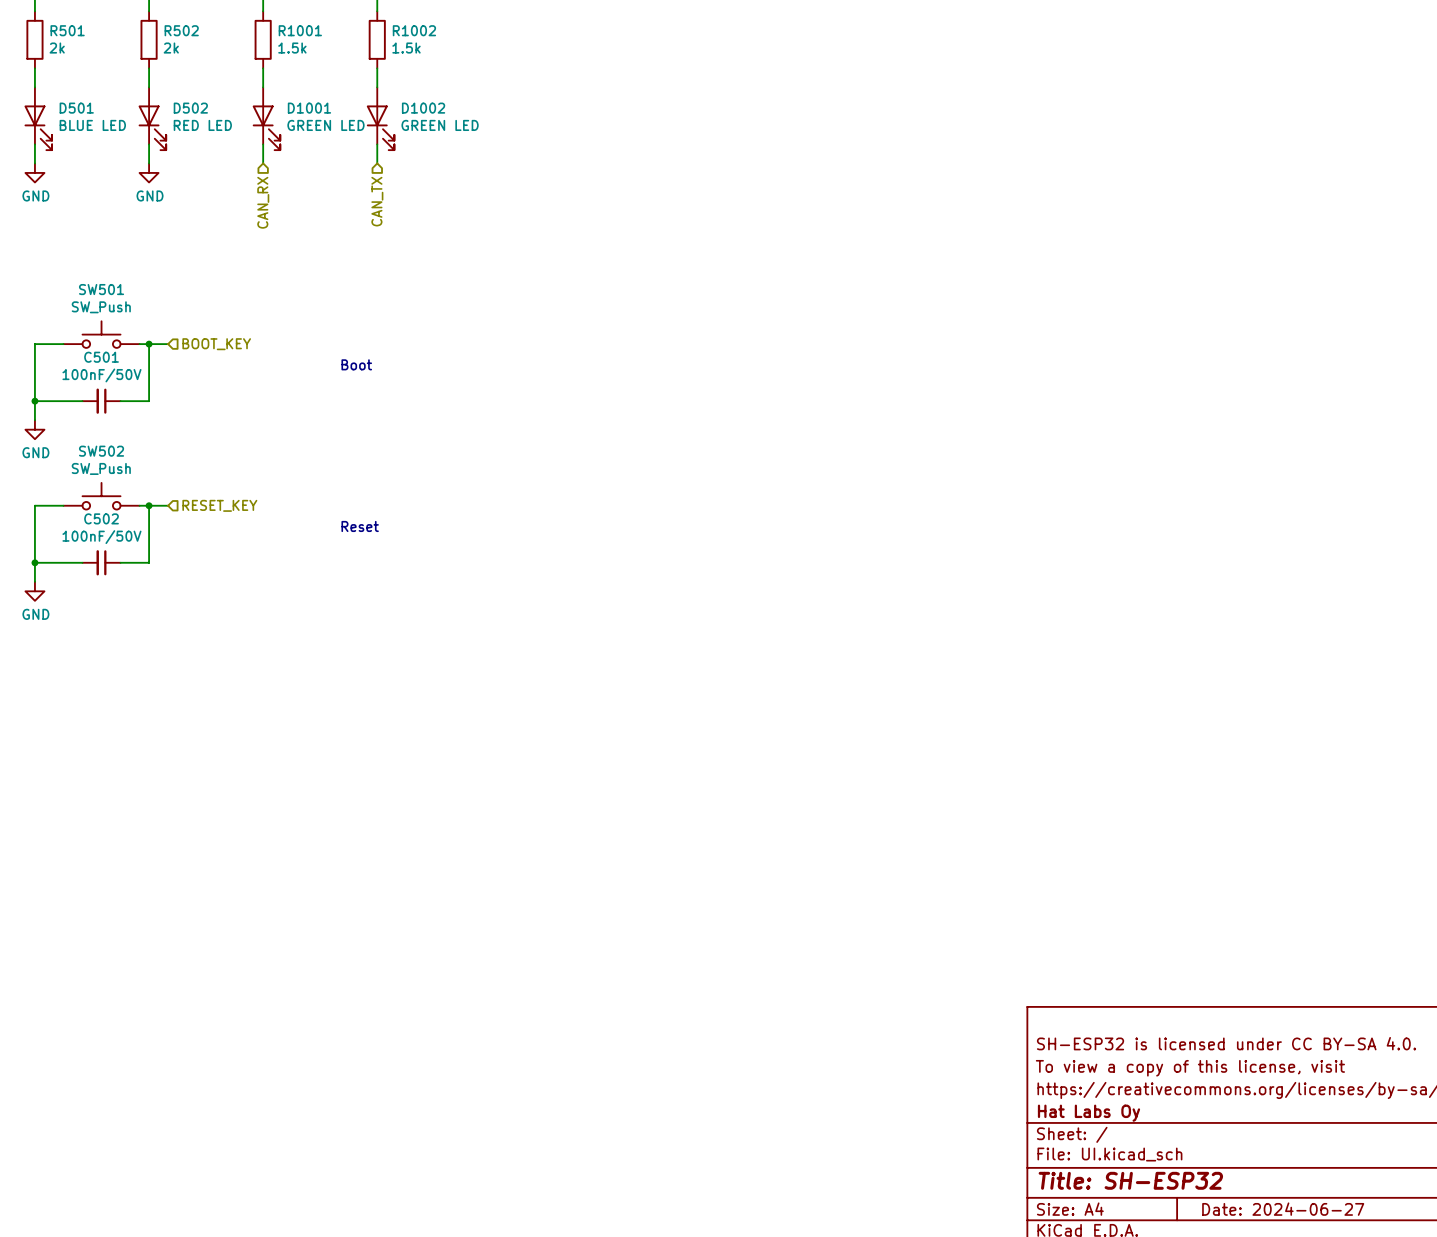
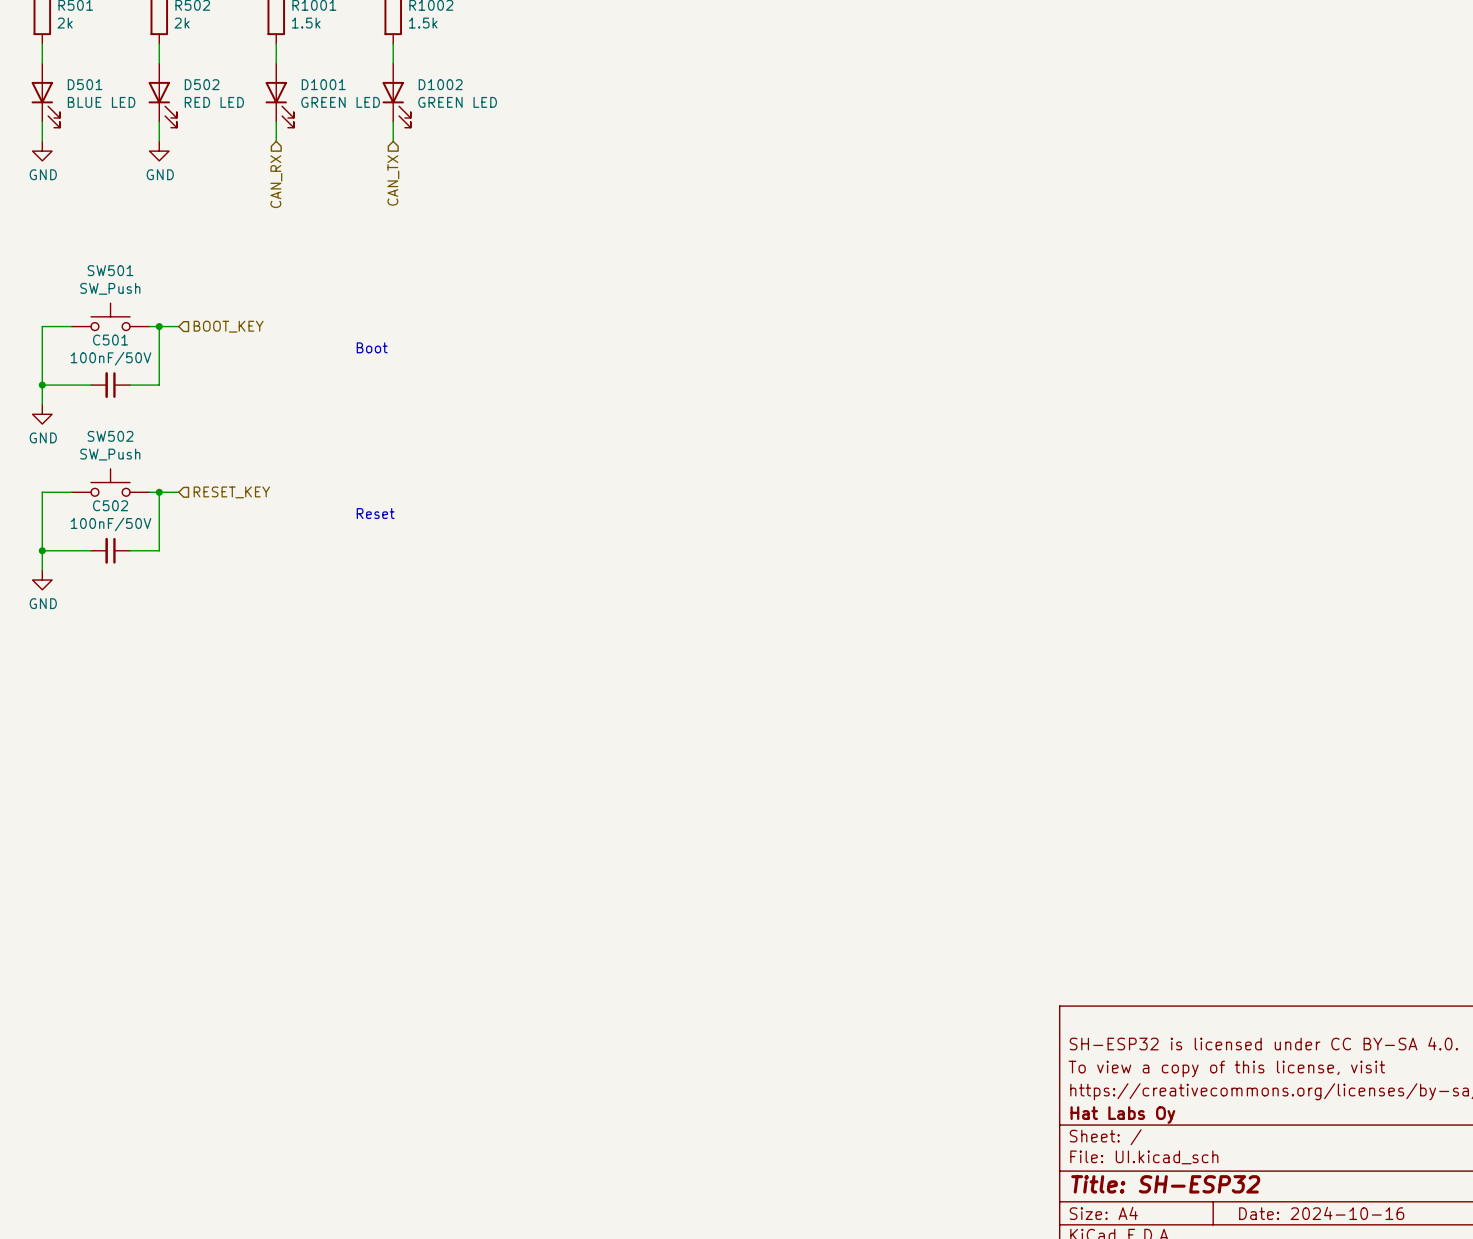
title block: Date: 2024-06-27 (1283, 1209) -> Date: 2024-10-16 (1321, 1213)

